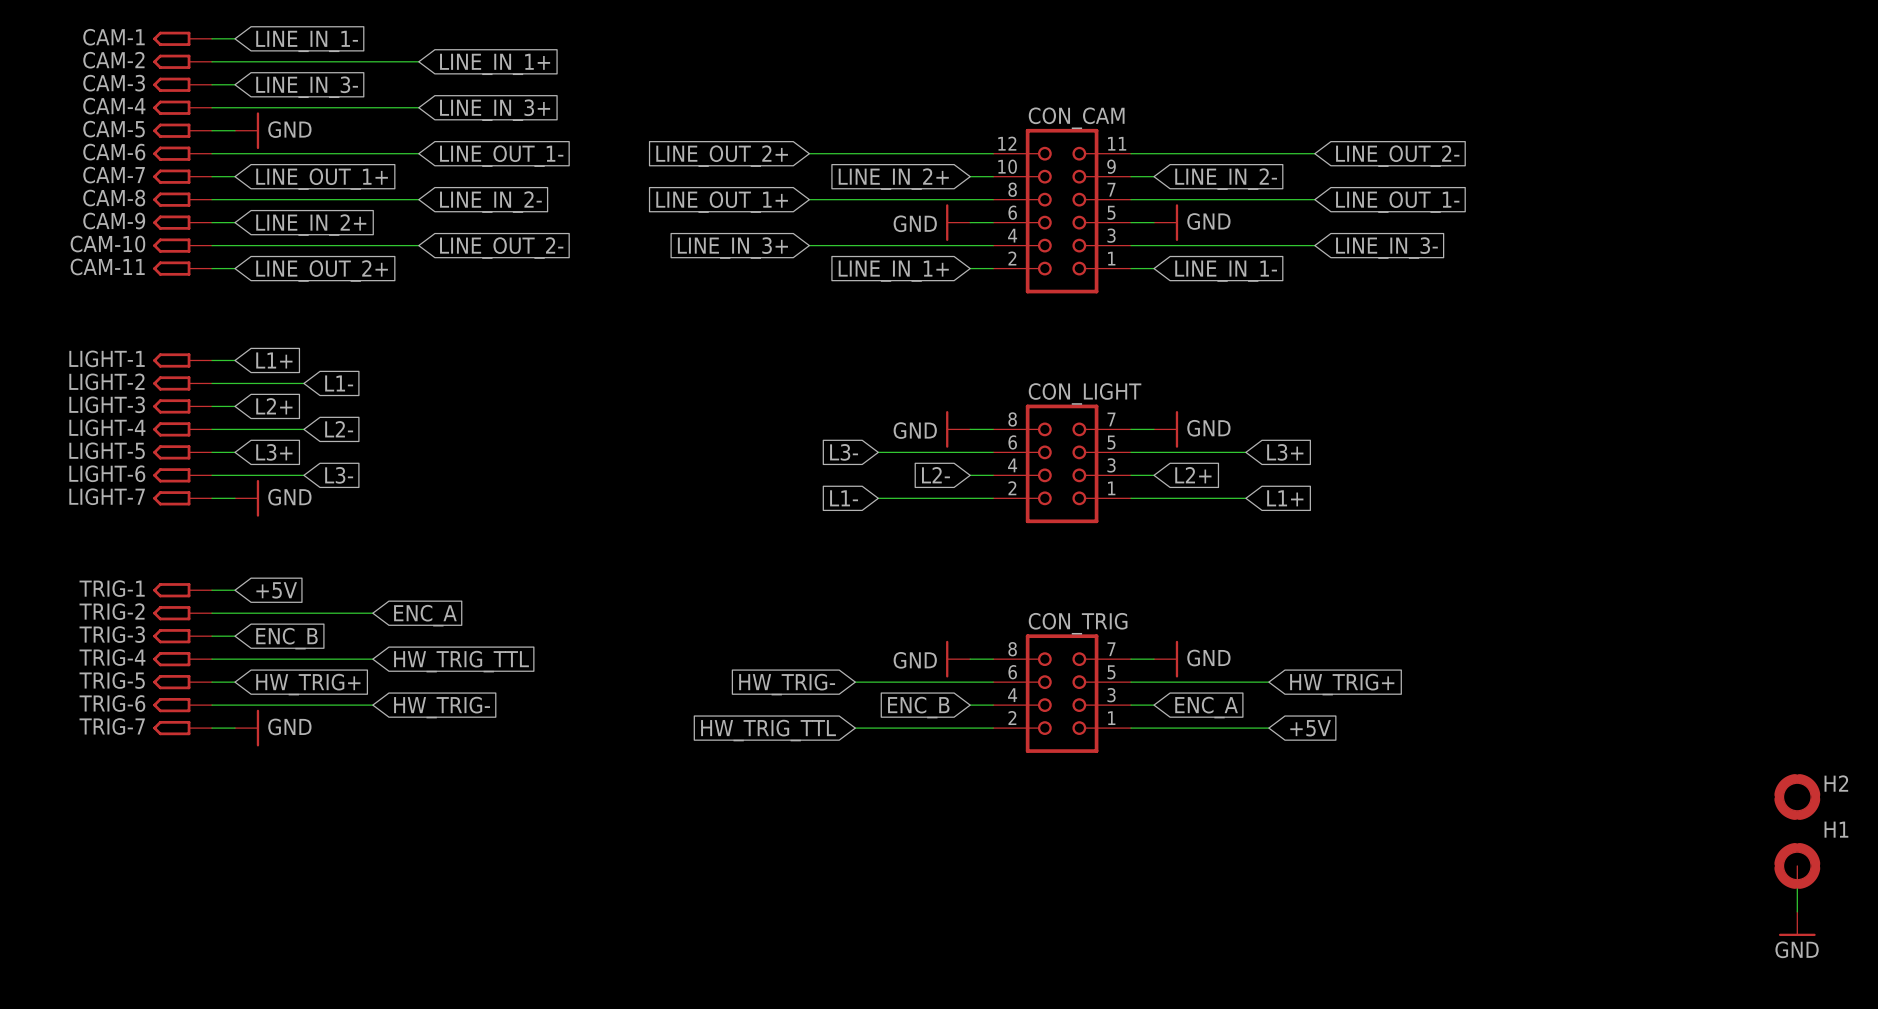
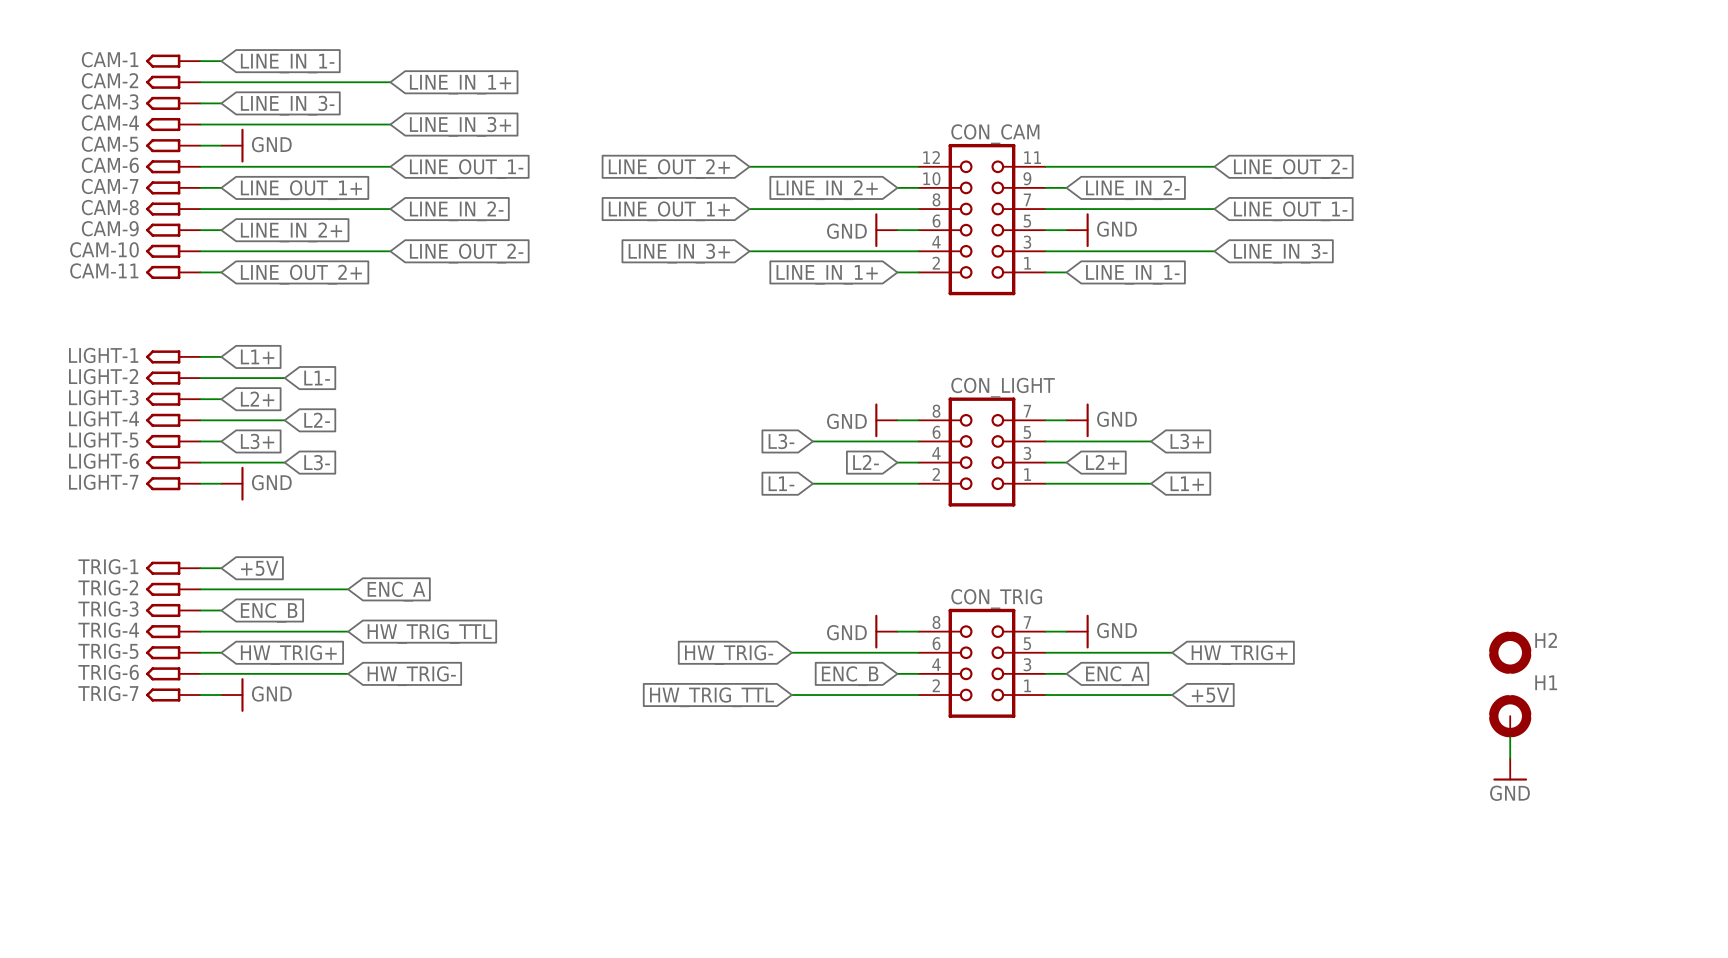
H2 position: (1797, 797) -> (1510, 652)
H1 position: (1797, 865) -> (1510, 716)
wire: (1797, 888) (1797, 911) -> (1510, 737) (1510, 758)
power symbol position: GND (1797, 923) -> GND (1510, 769)

